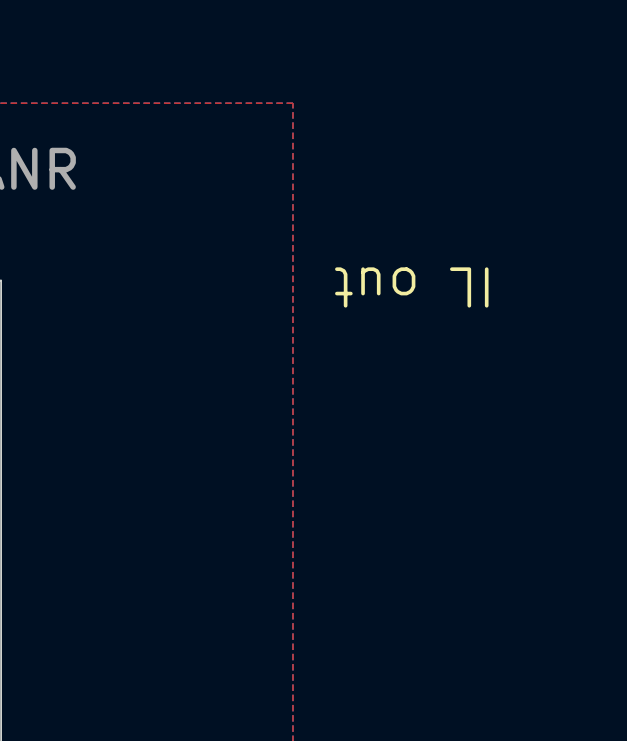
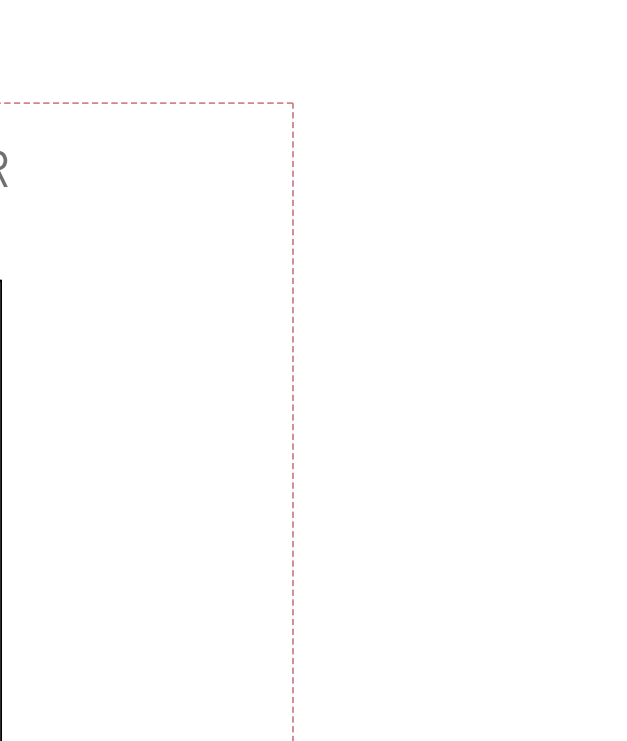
text: IL out (411, 287) -> none

